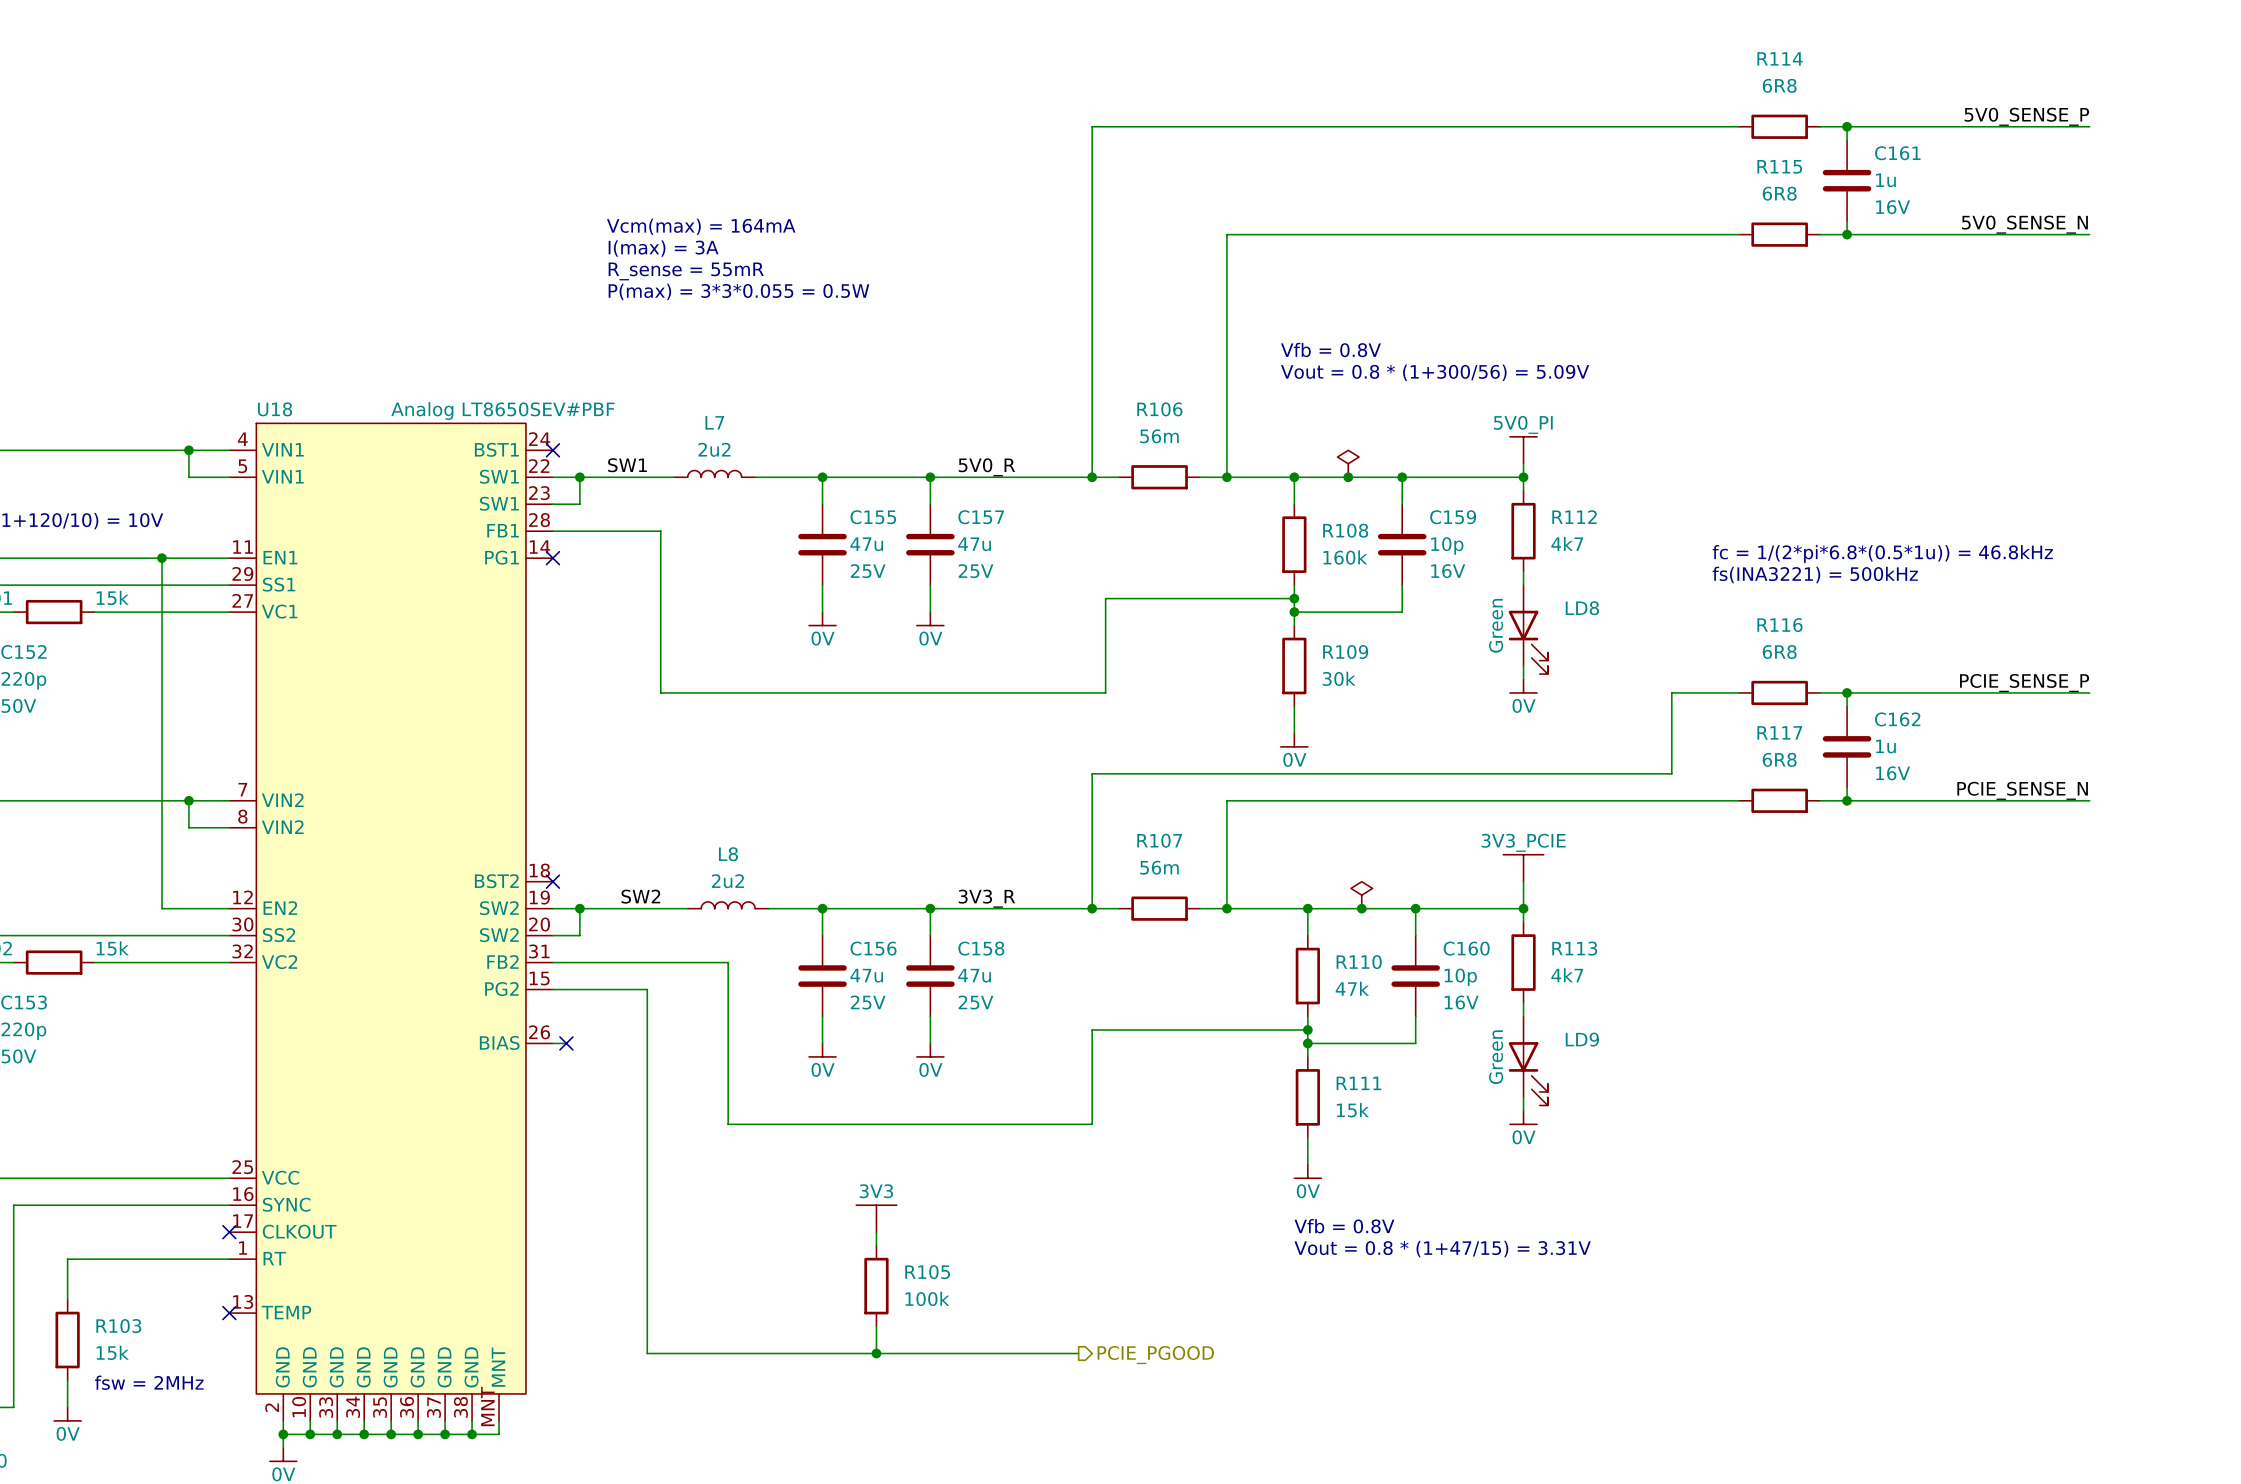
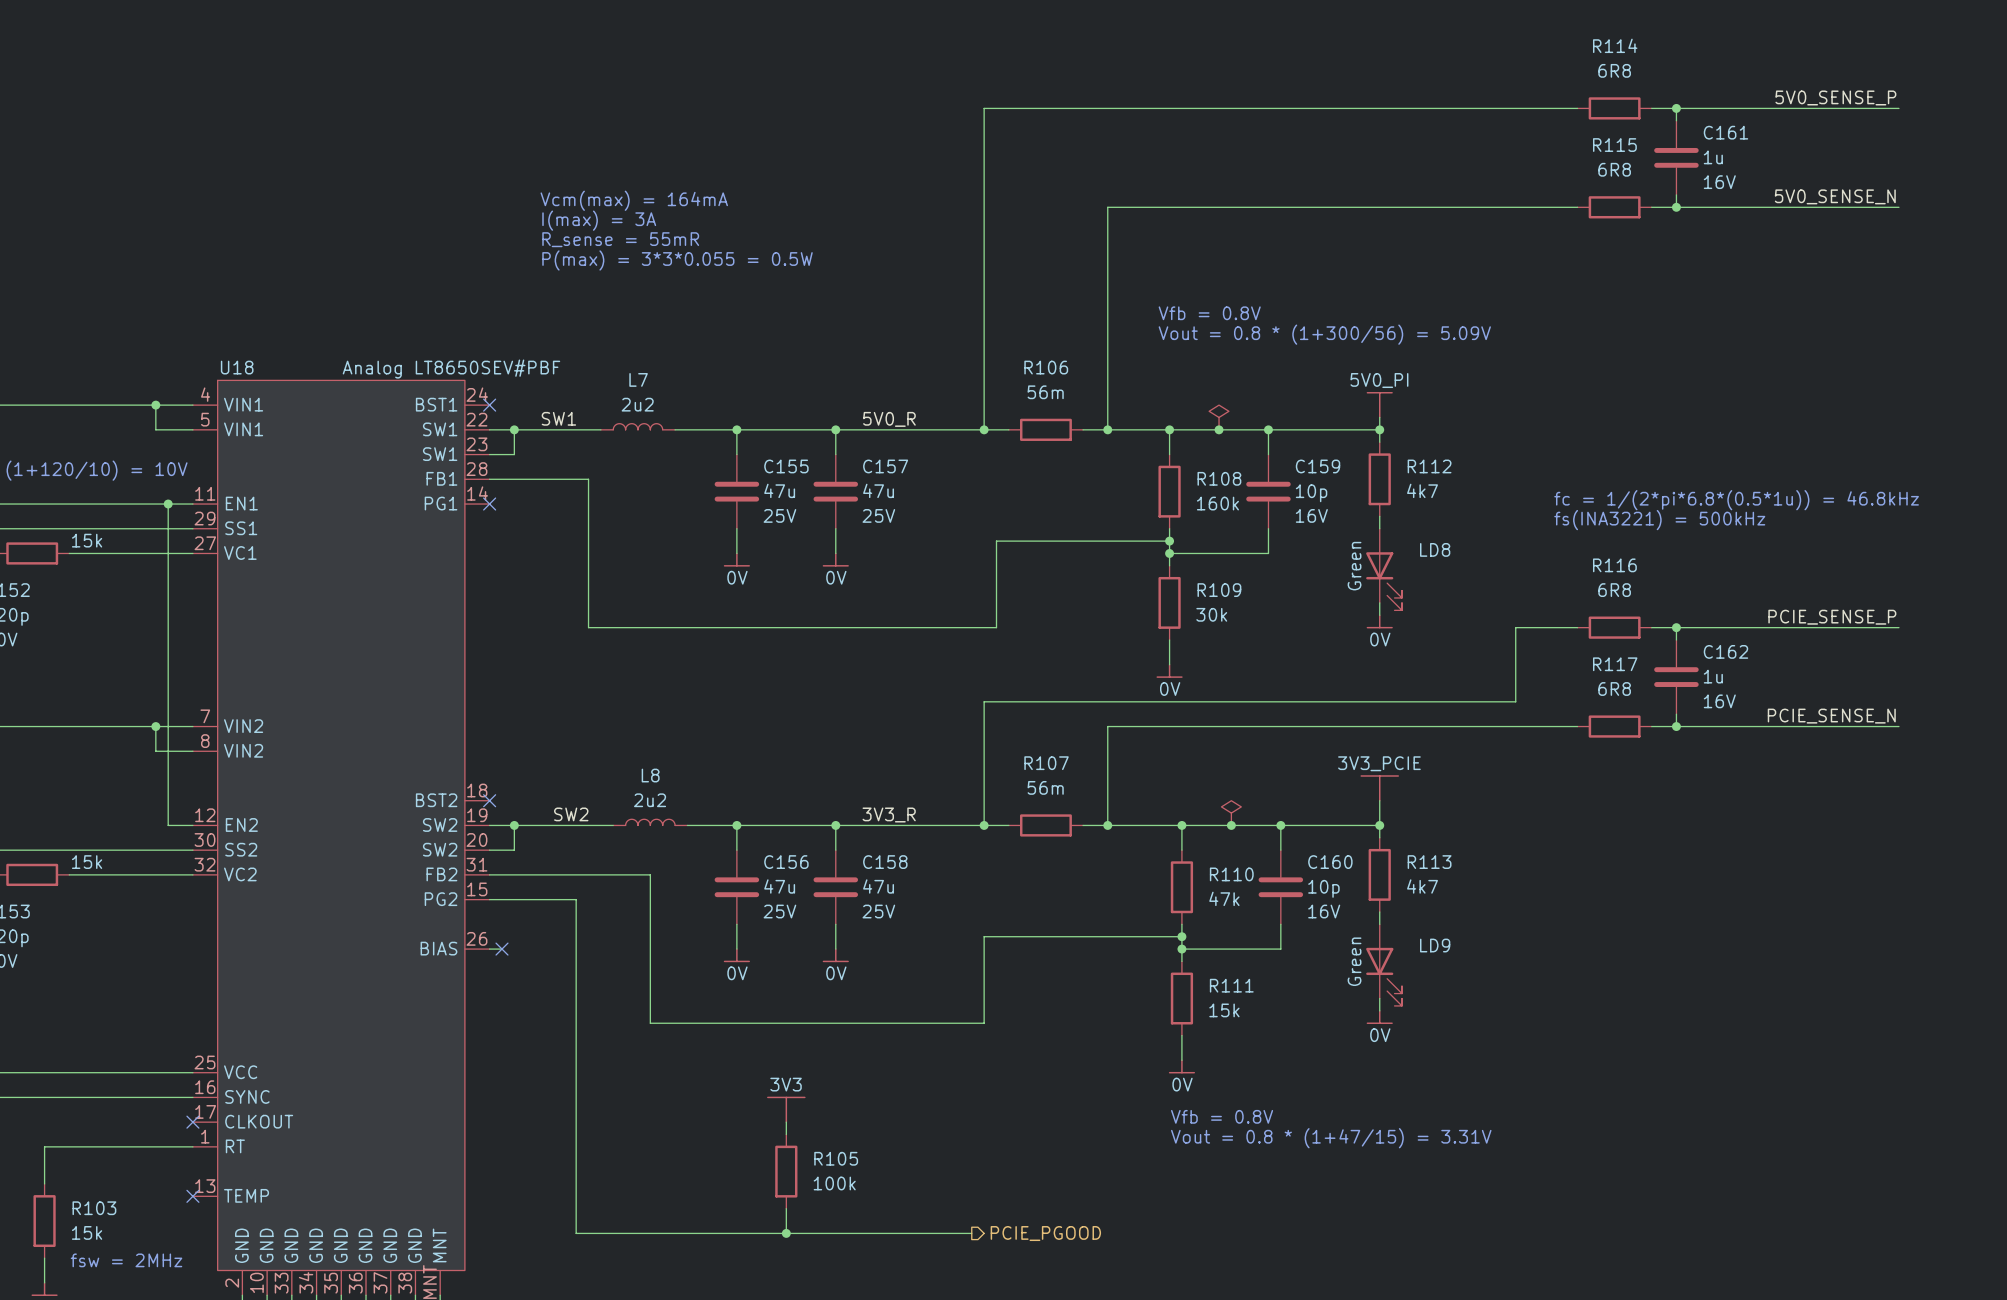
wire: (161, 558) (161, 908) (202, 908) -> (168, 504) (168, 825)
junction position: (161, 558) -> (168, 504)

